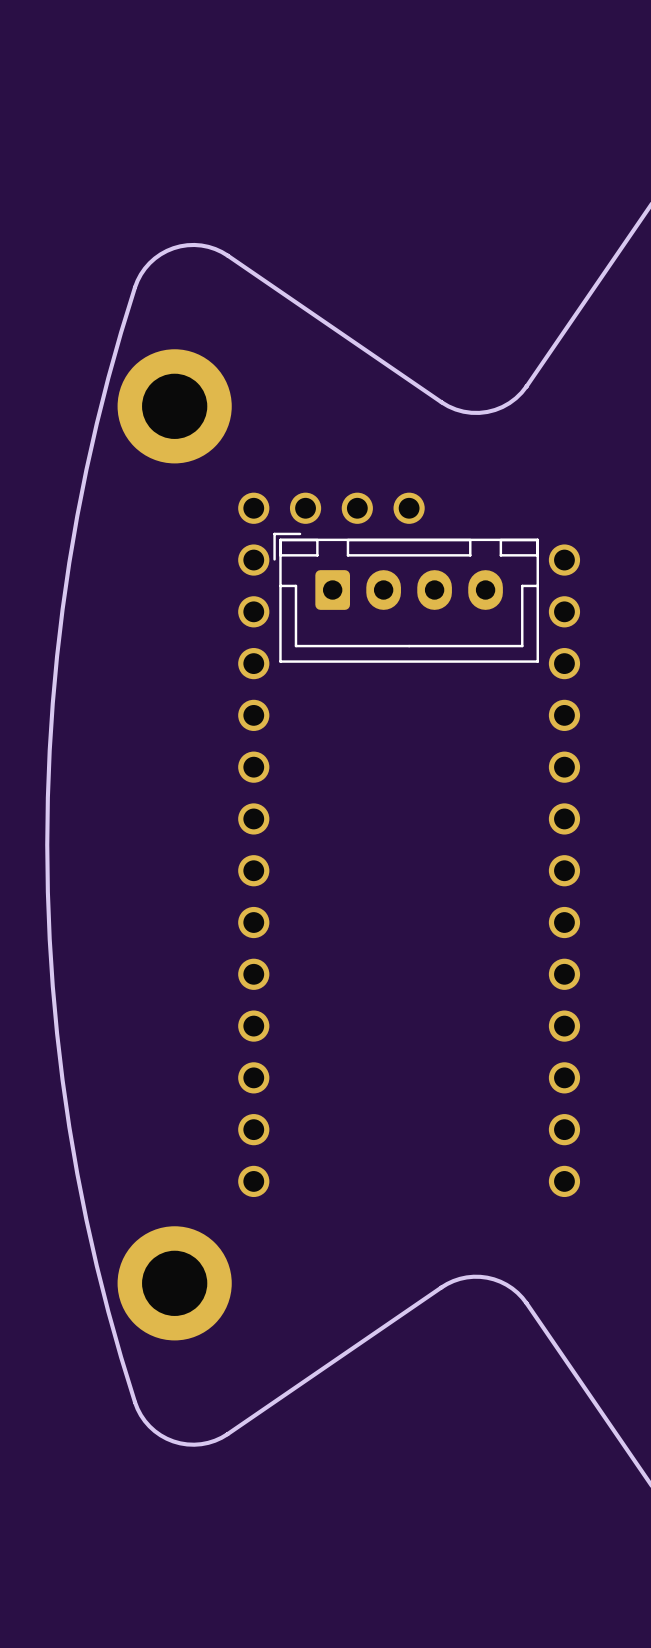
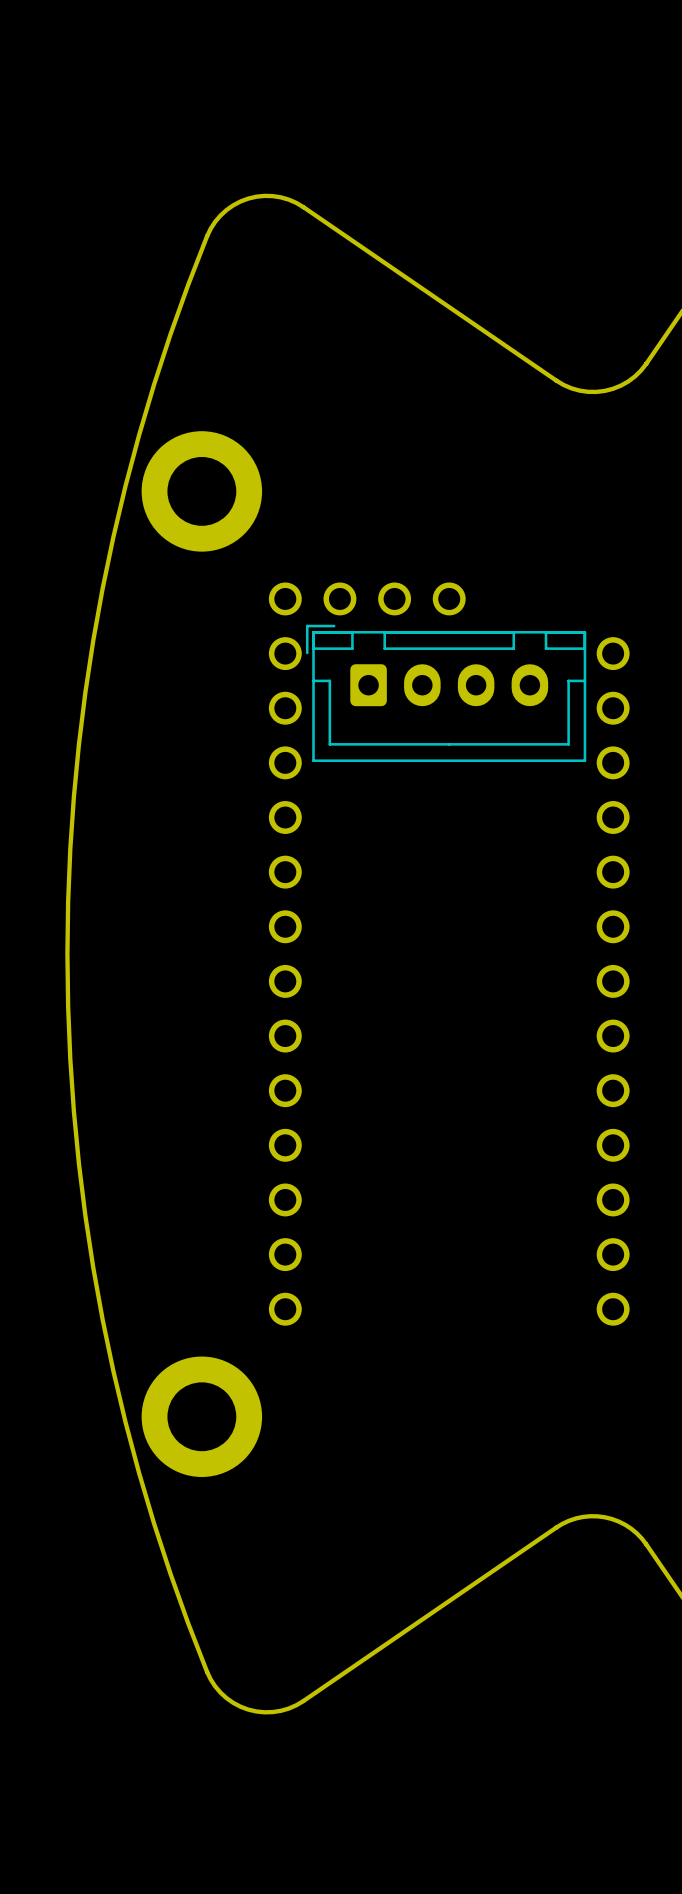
board edge: (595, 285) (521, 392) (509, 403) (495, 409) (471, 412) (455, 409) (441, 402) (221, 252) (201, 245) (180, 246) (160, 254) (149, 263) (137, 280) (121, 332) (96, 423) (77, 516) (62, 609) (52, 703) (47, 844) (52, 986) (62, 1080) (77, 1173) (96, 1265) (121, 1357) (137, 1408) (149, 1426) (166, 1438) (187, 1444) (208, 1442) (221, 1437) (441, 1287) (459, 1278) (473, 1276) (487, 1277) (500, 1281) (512, 1288) (522, 1297) (595, 1404) -> (646, 363) (634, 376) (612, 388) (596, 391) (571, 388) (556, 380) (296, 202) (280, 197) (256, 196) (240, 201) (220, 215) (207, 236) (154, 384) (125, 485) (102, 588) (85, 692) (73, 796) (67, 954) (70, 1059) (78, 1163) (102, 1319) (125, 1422) (154, 1523) (207, 1672) (220, 1692) (233, 1702) (256, 1711) (280, 1710) (296, 1705) (569, 1520) (590, 1516) (611, 1518) (631, 1528) (646, 1544)

